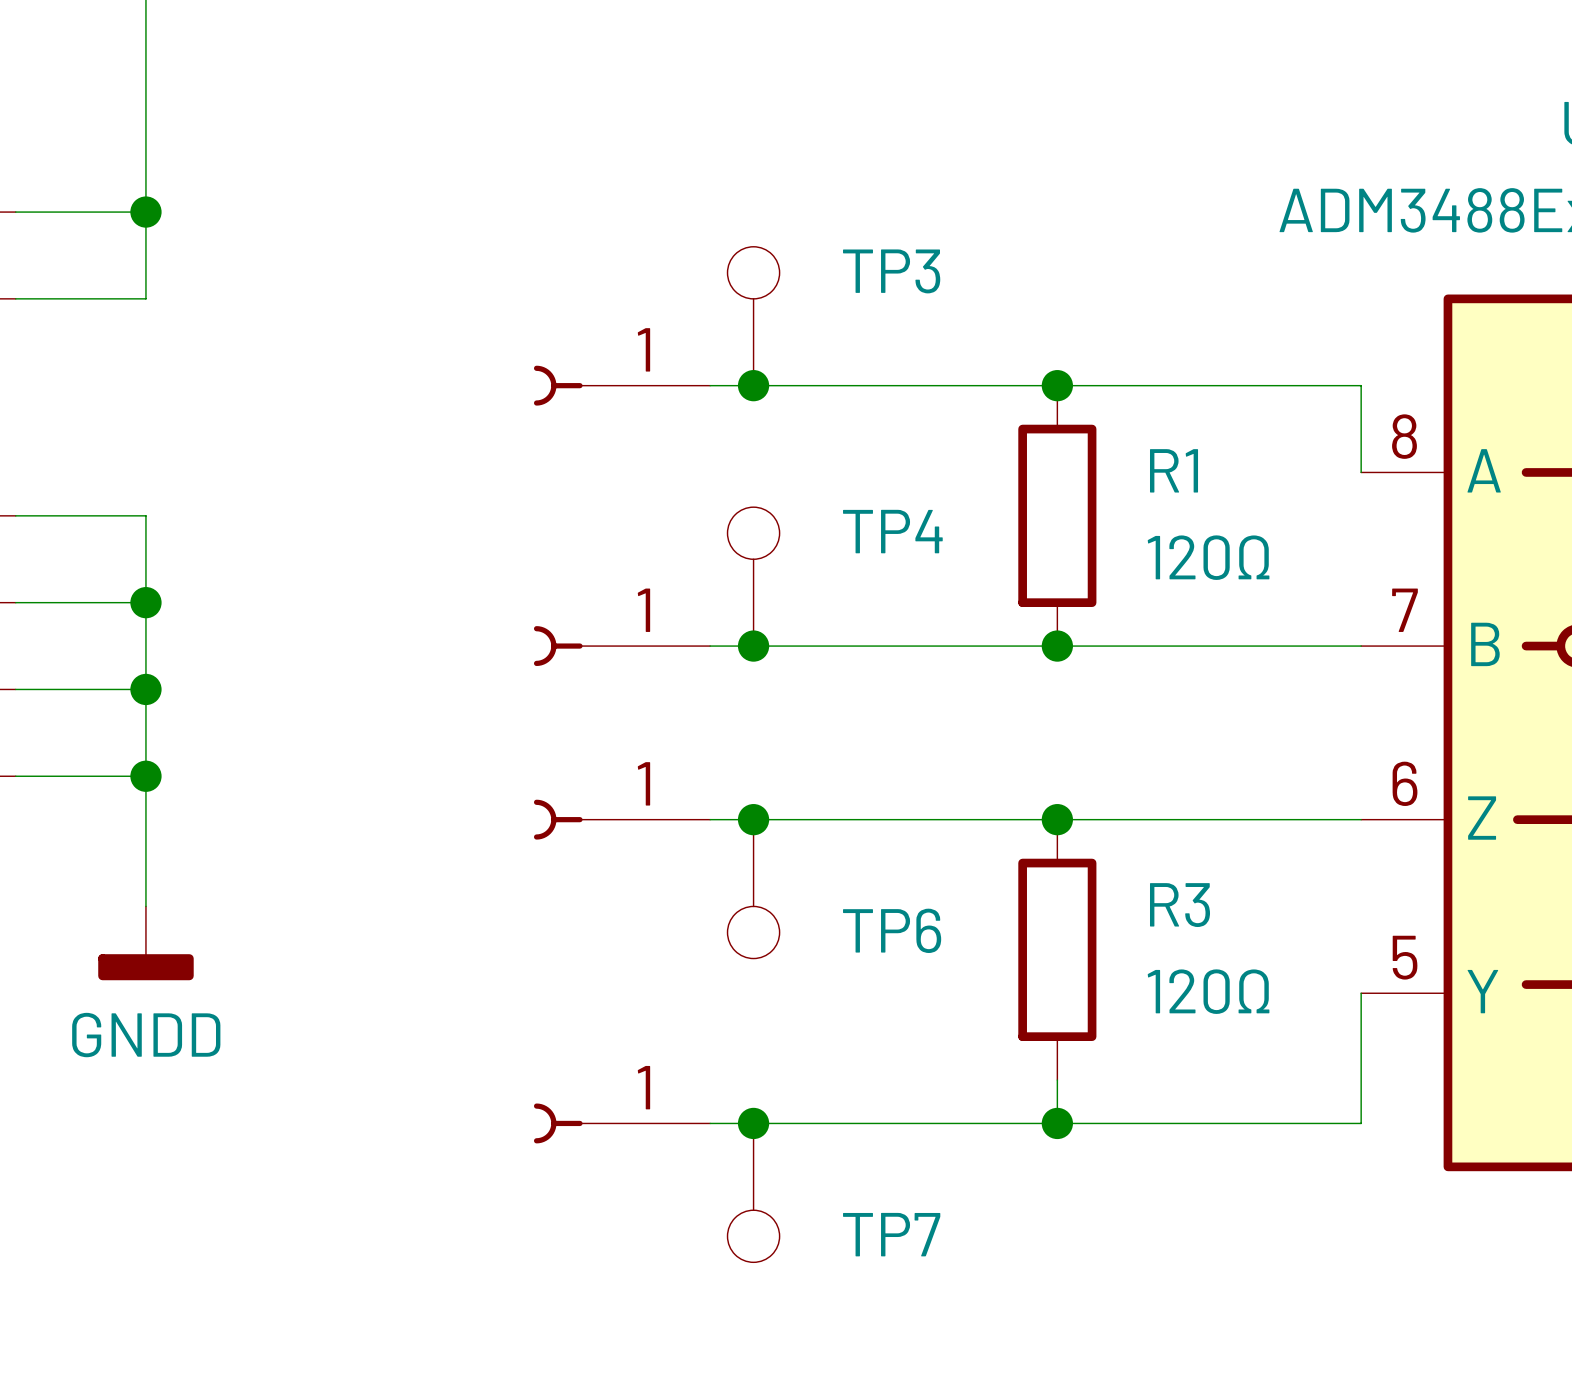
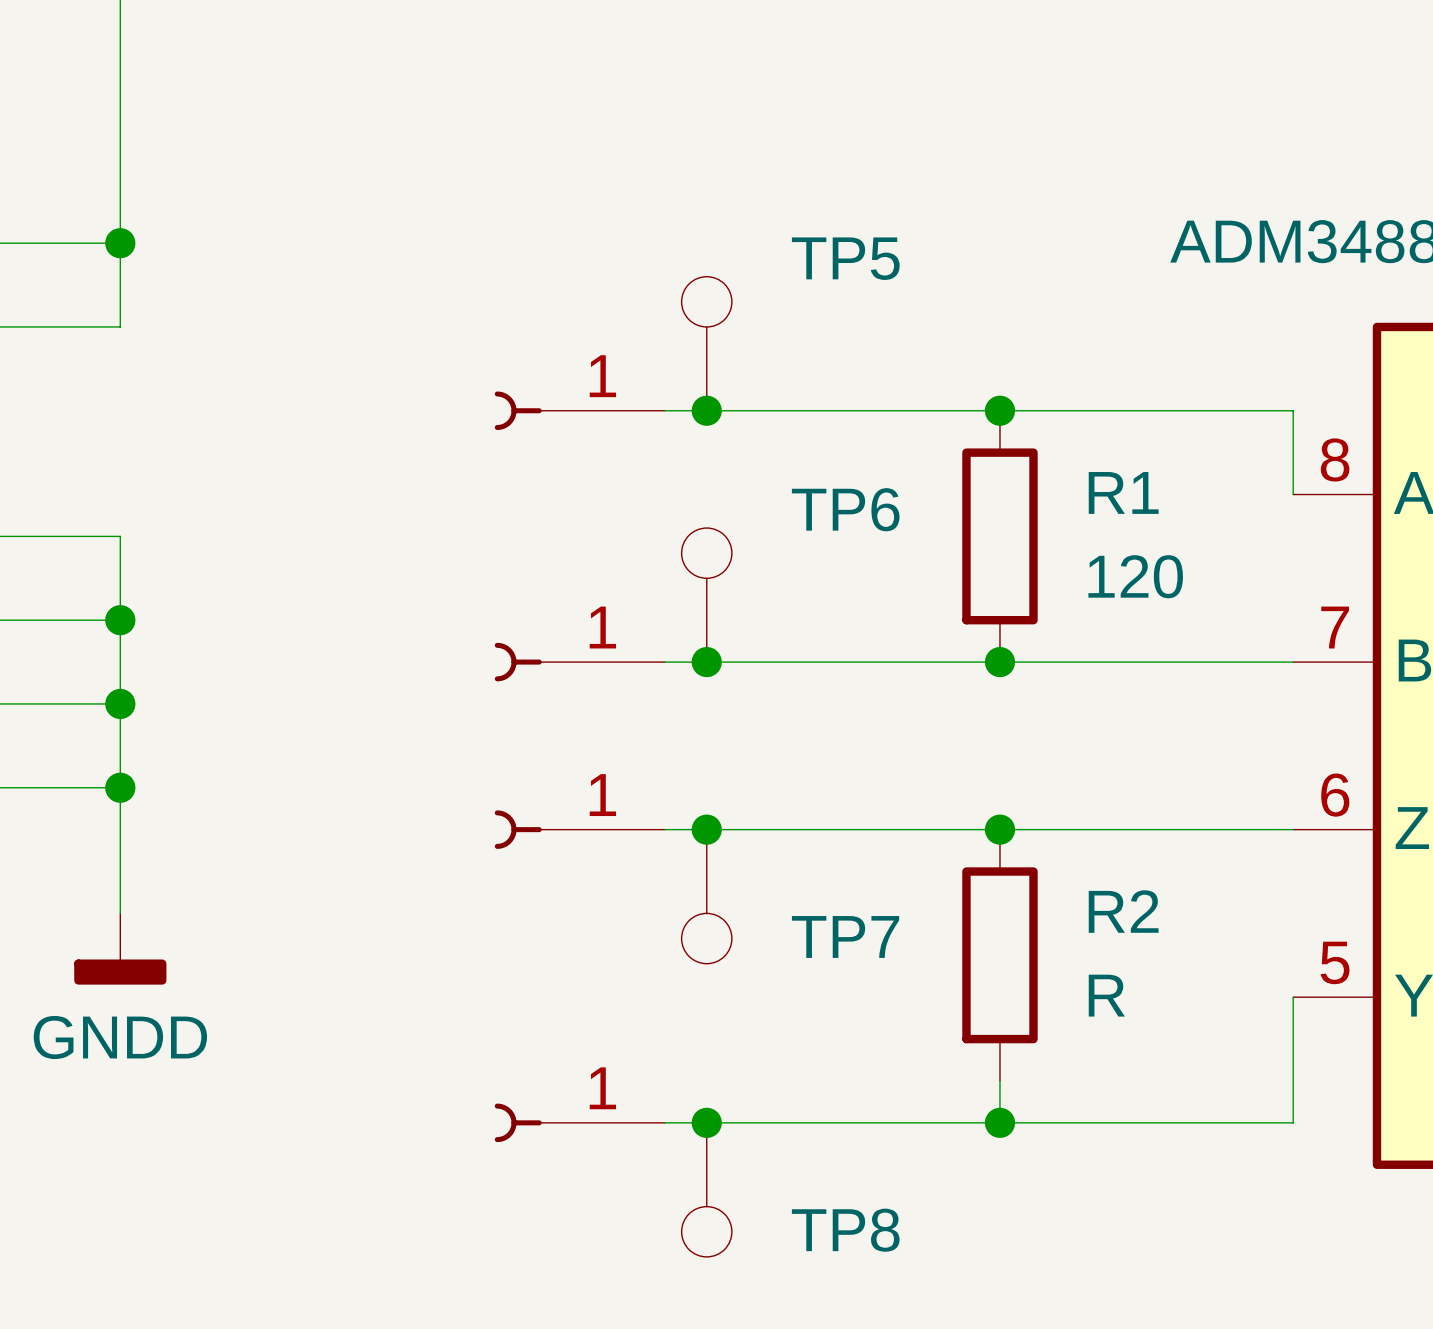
TP3 name: TP3 (891, 271) -> TP5 (845, 258)
TP4 name: TP4 (892, 531) -> TP6 (845, 509)
R1 value: 120Ω (1208, 557) -> 120 (1135, 576)
R3 name: R3 (1179, 905) -> R2 (1123, 911)
TP6 name: TP6 (892, 930) -> TP7 (845, 936)
R3 value: 120Ω (1208, 991) -> R (1106, 995)
TP7 name: TP7 (891, 1234) -> TP8 (845, 1230)

